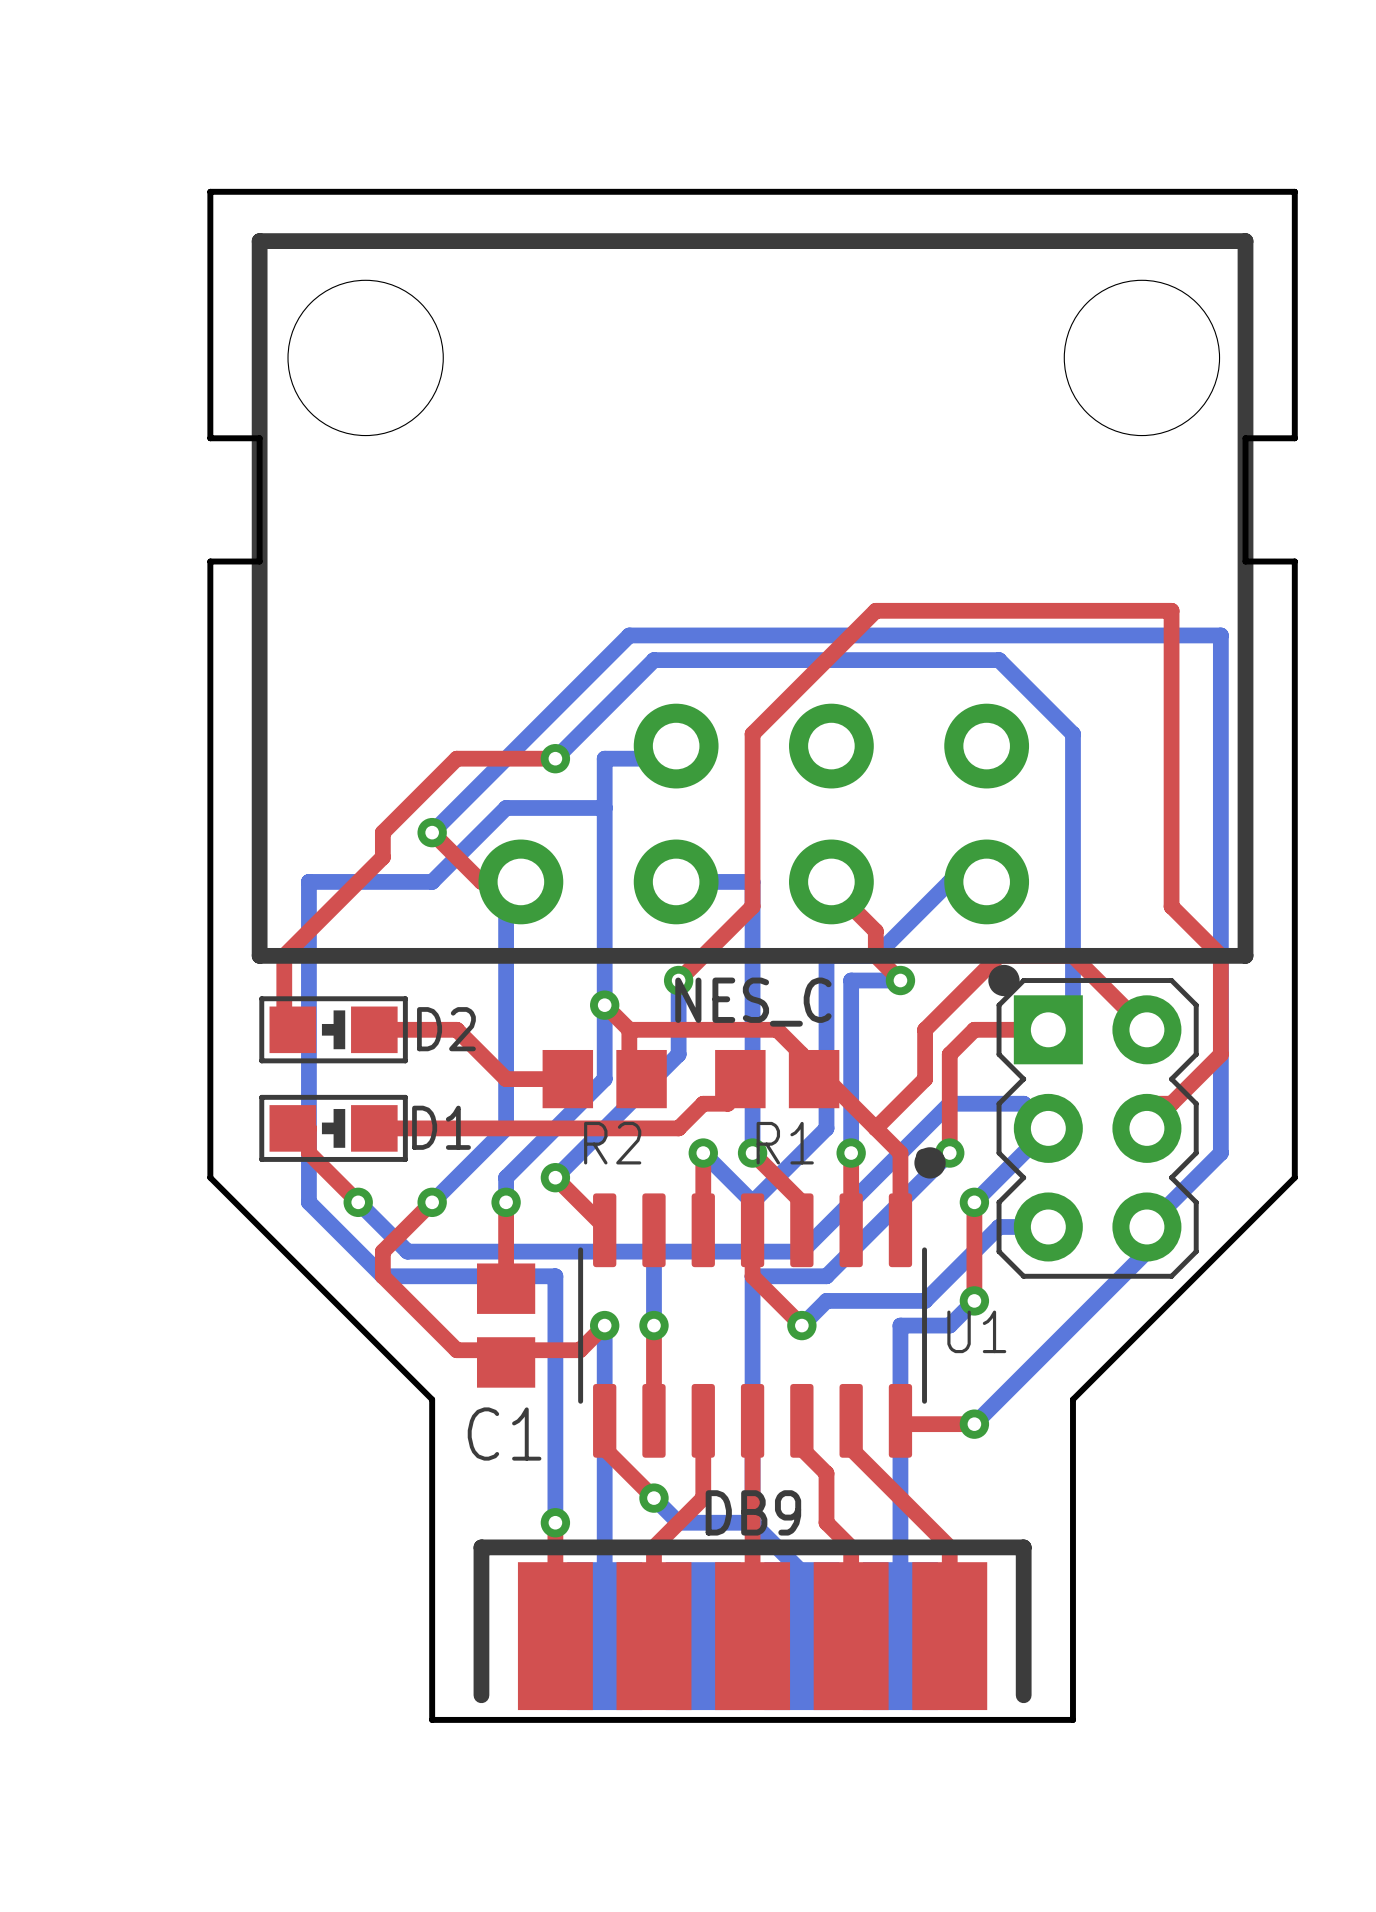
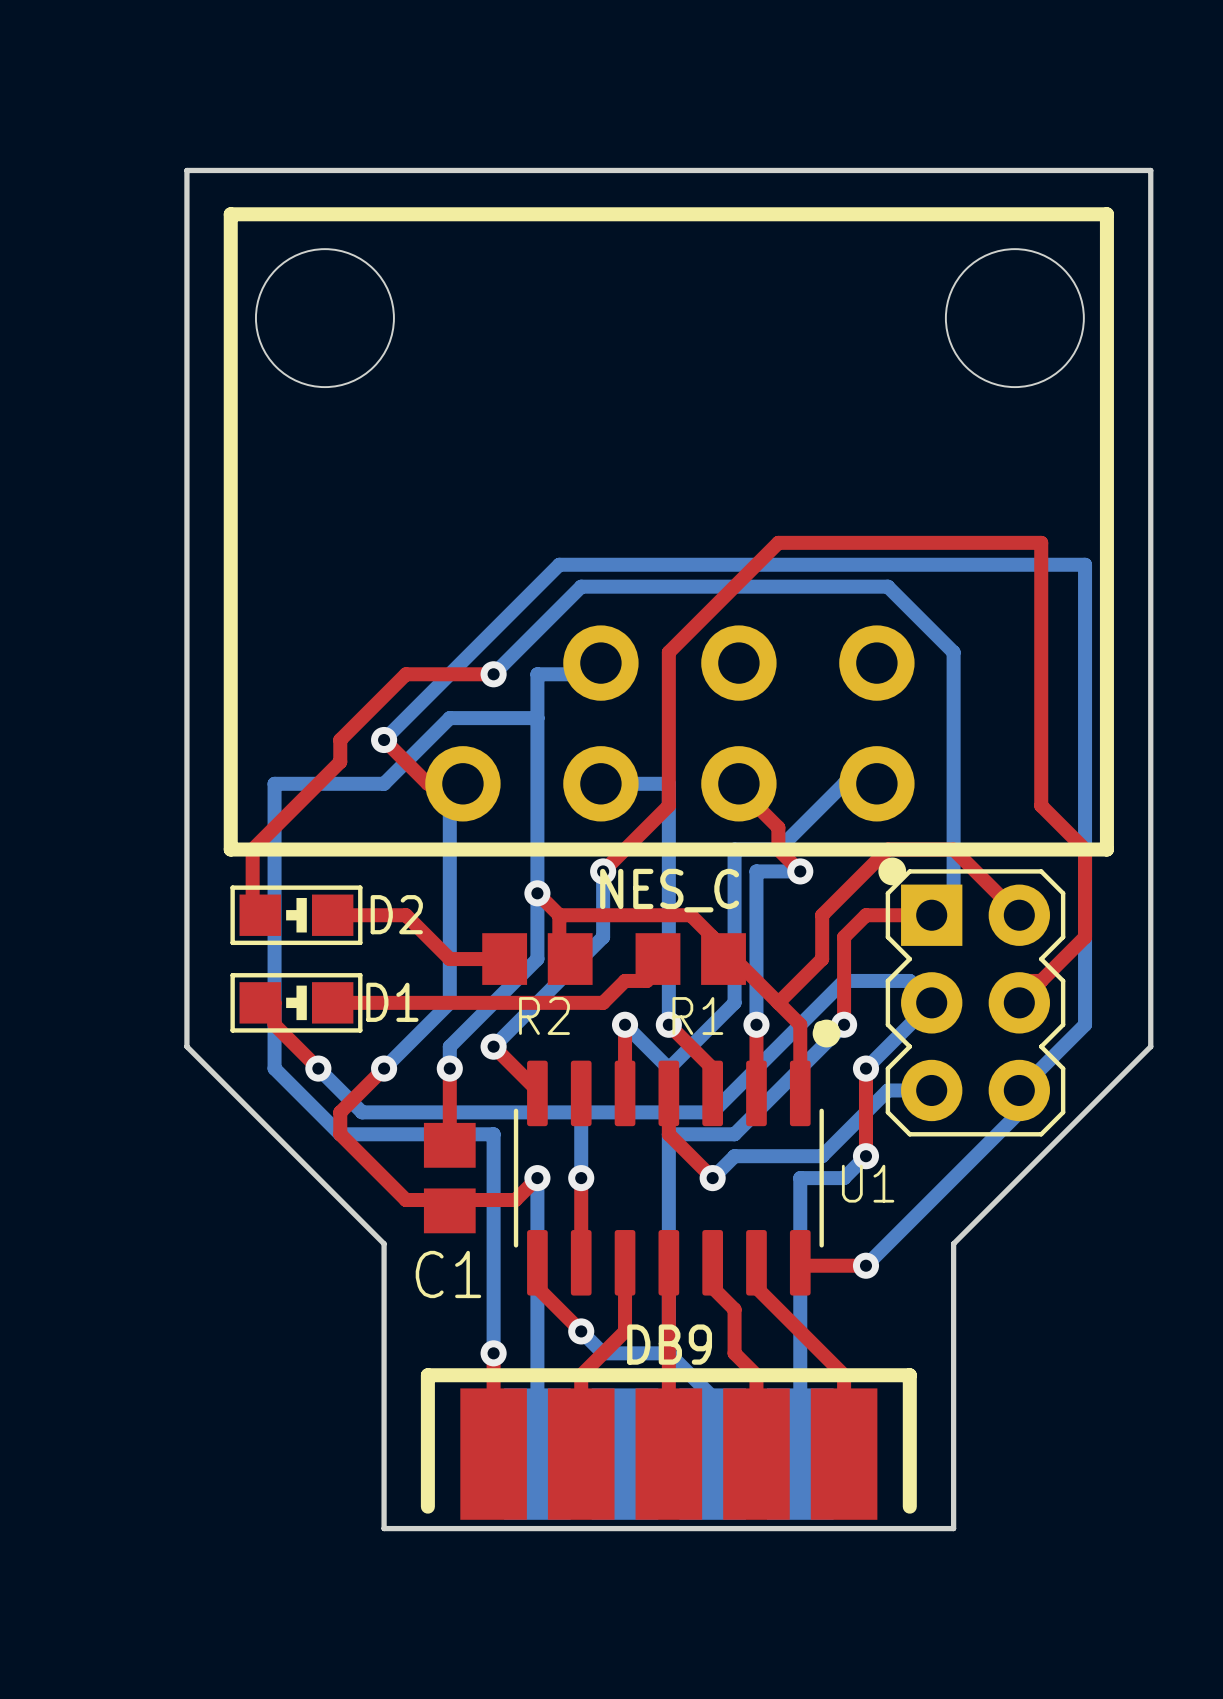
board edge: (210, 438) (259, 438) (259, 561) (210, 561) -> (186, 389) (186, 499)
board edge: (1294, 438) (1245, 438) (1245, 561) (1294, 561) -> (1150, 389) (1150, 499)

